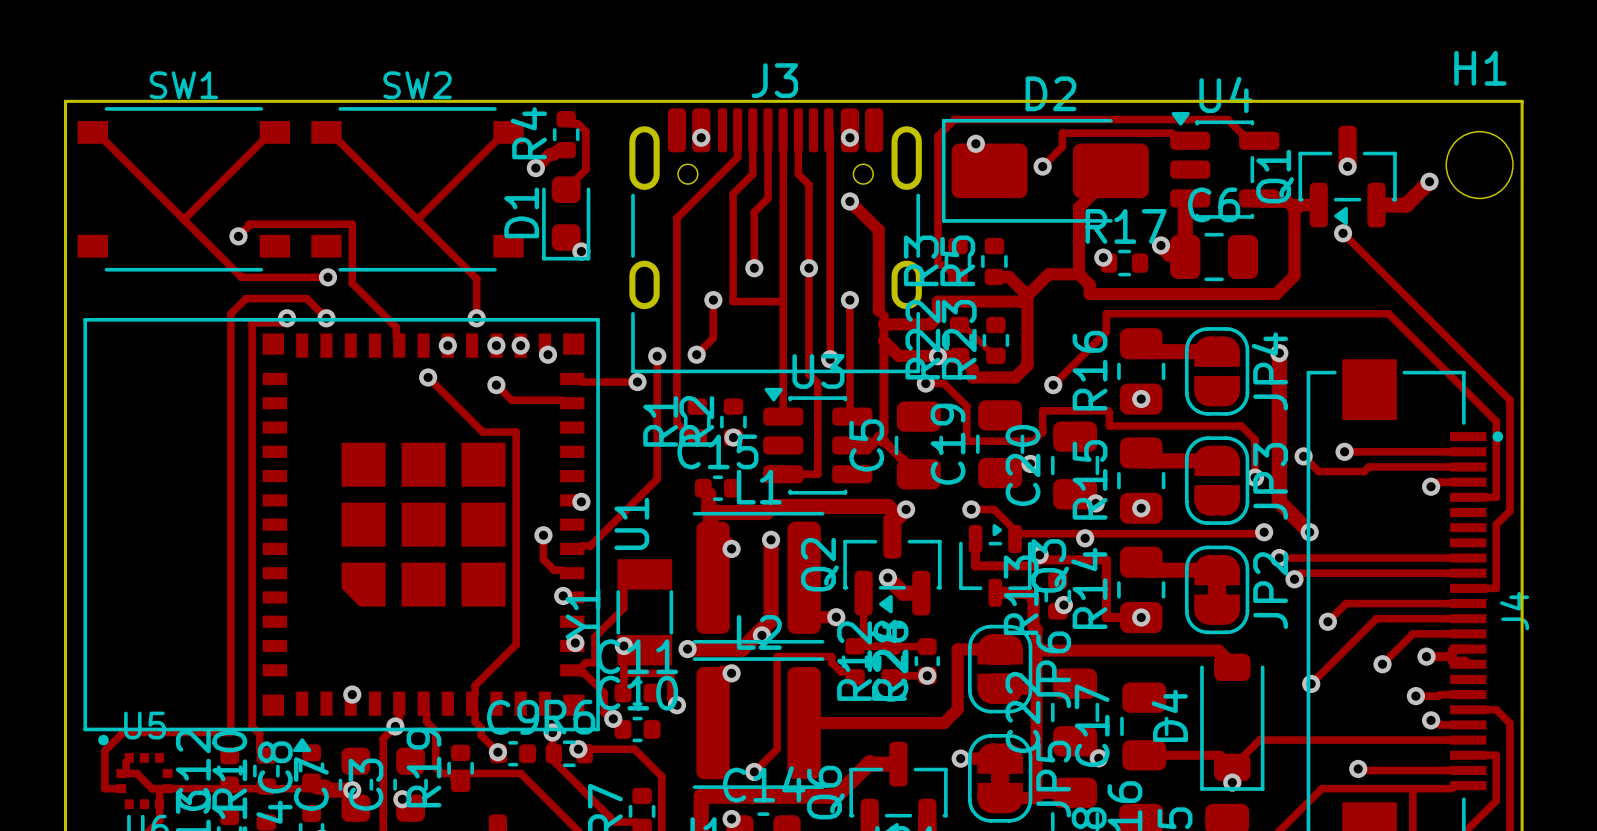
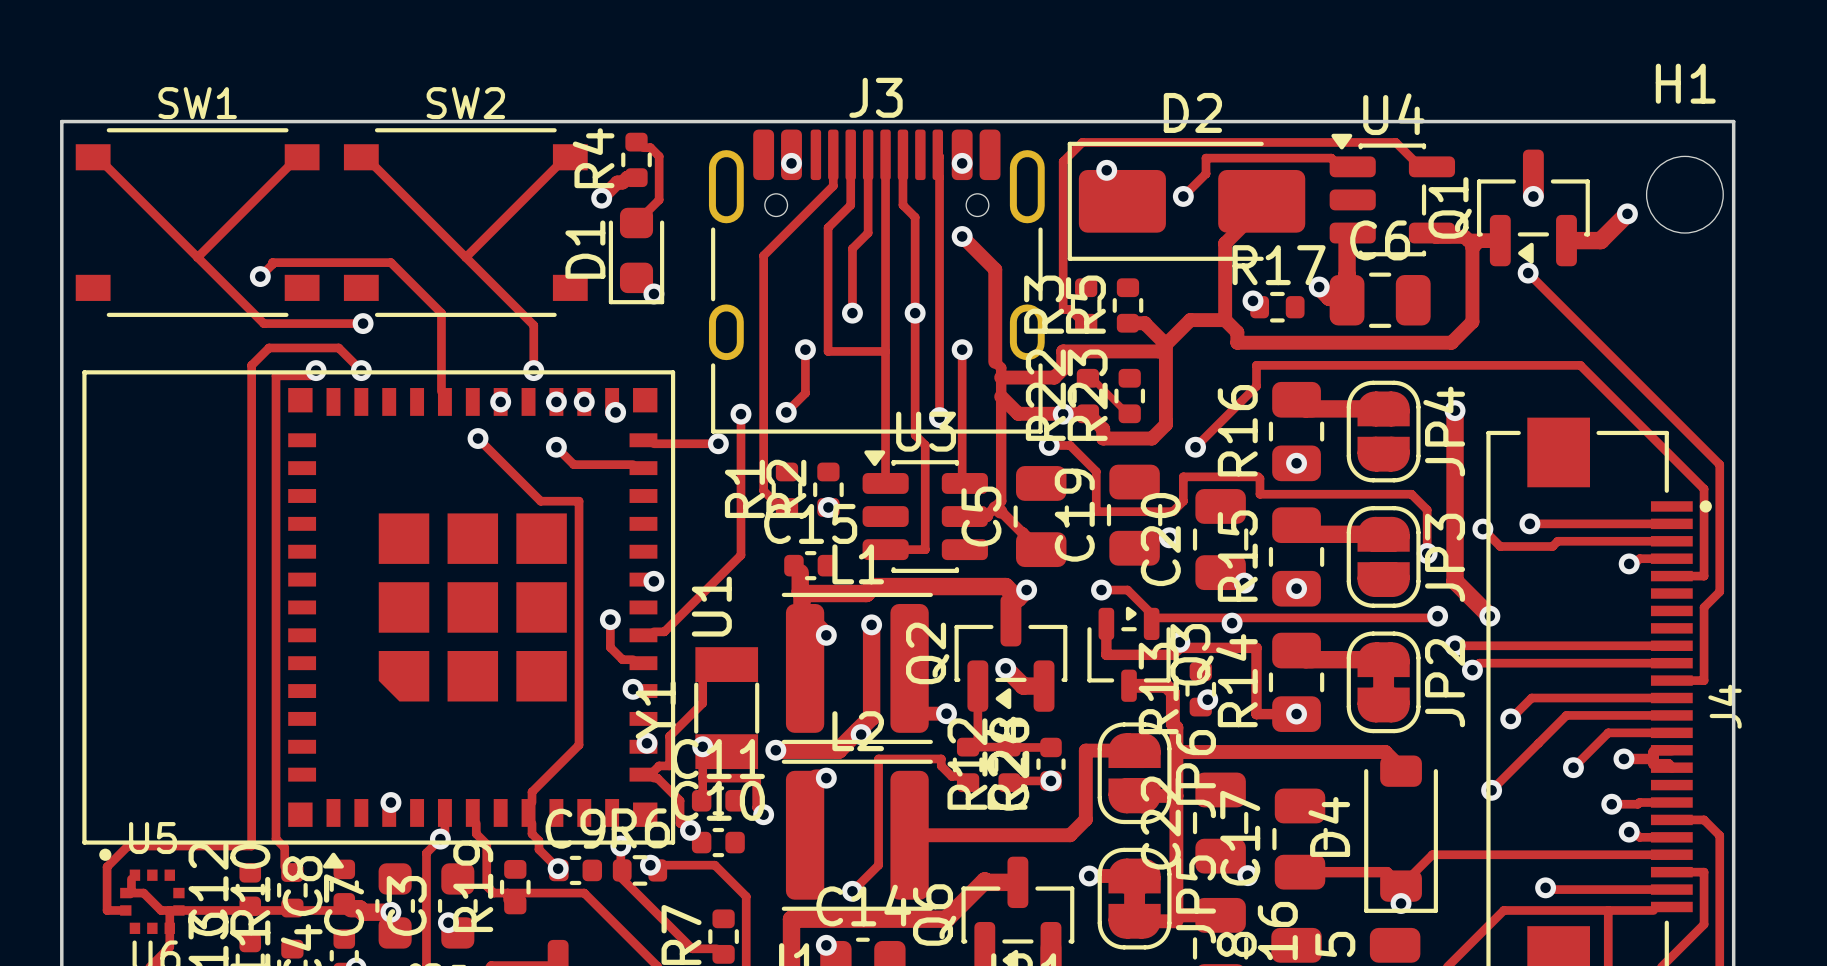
track: (352, 224) (352, 283) (396, 327) -> (390, 262) (441, 313) (441, 381)

